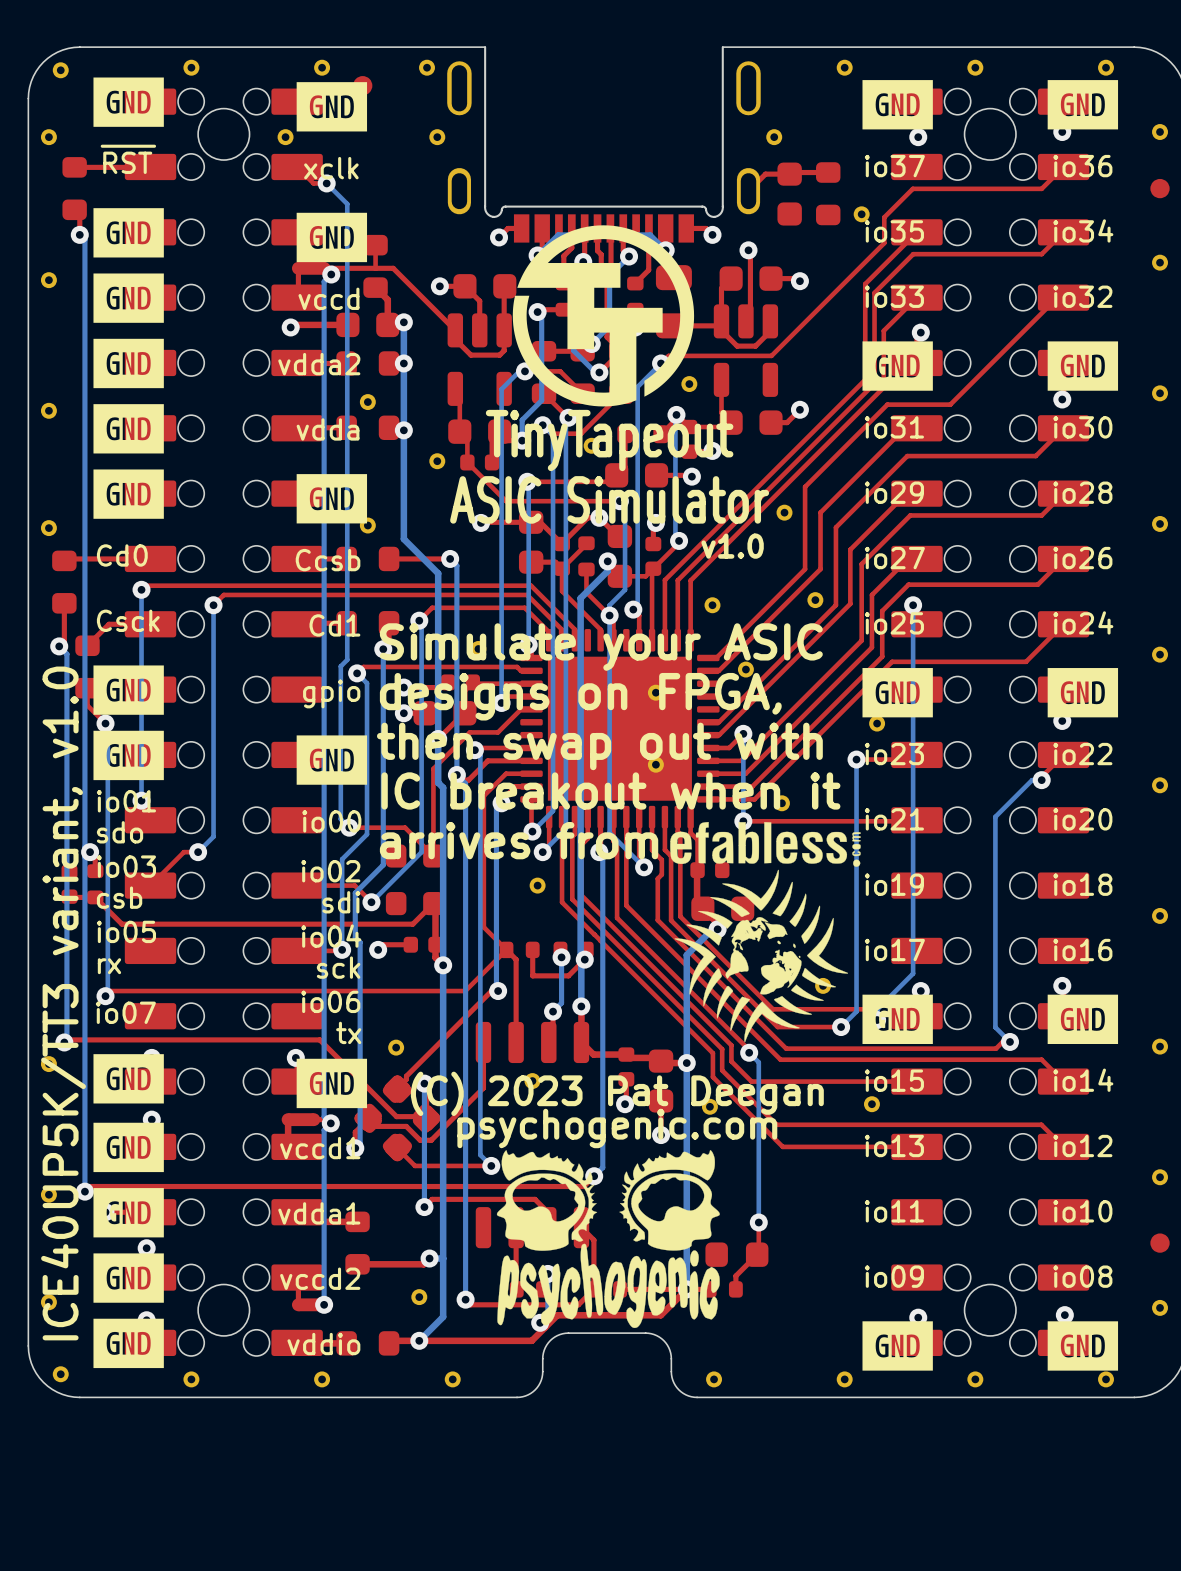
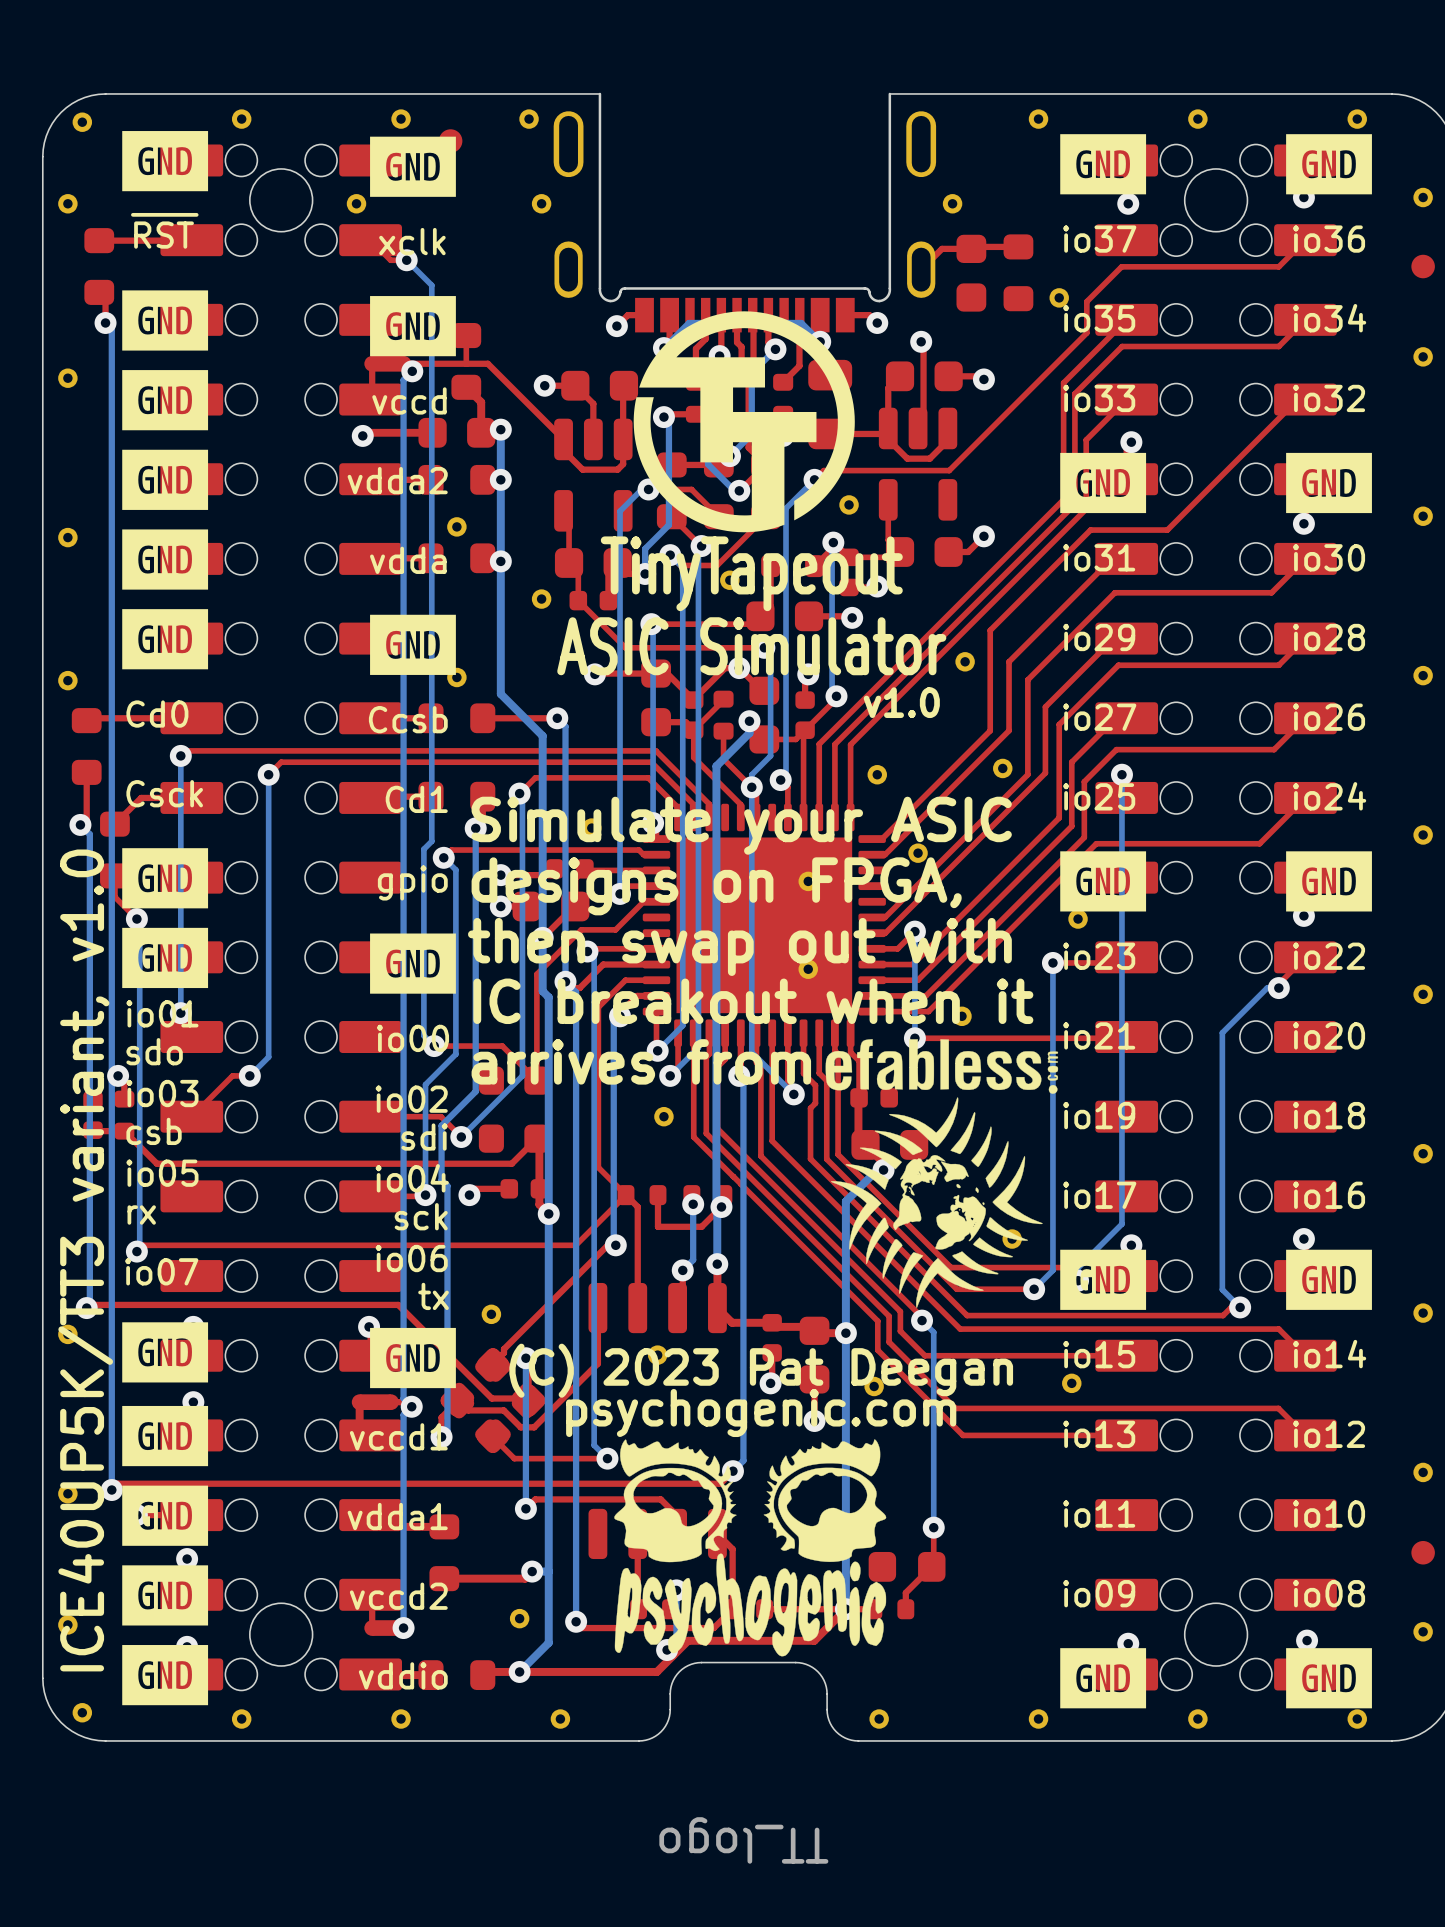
drawing shape: [512, 225, 695, 407] -> [633, 311, 855, 1864]

